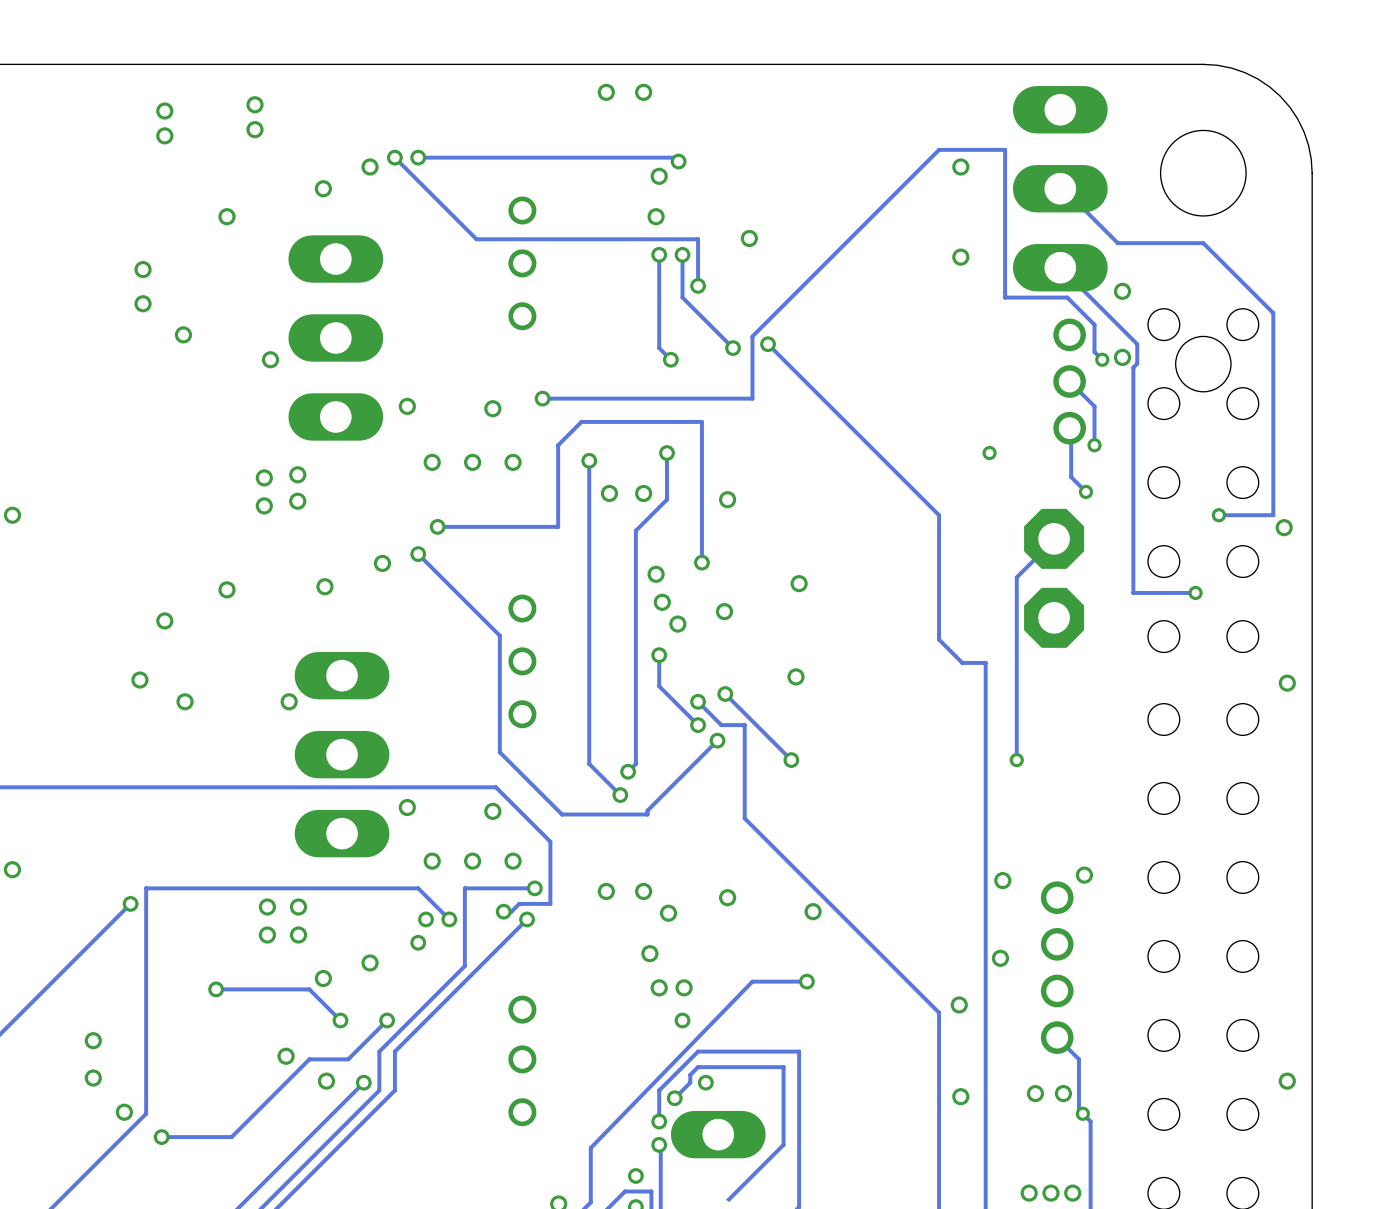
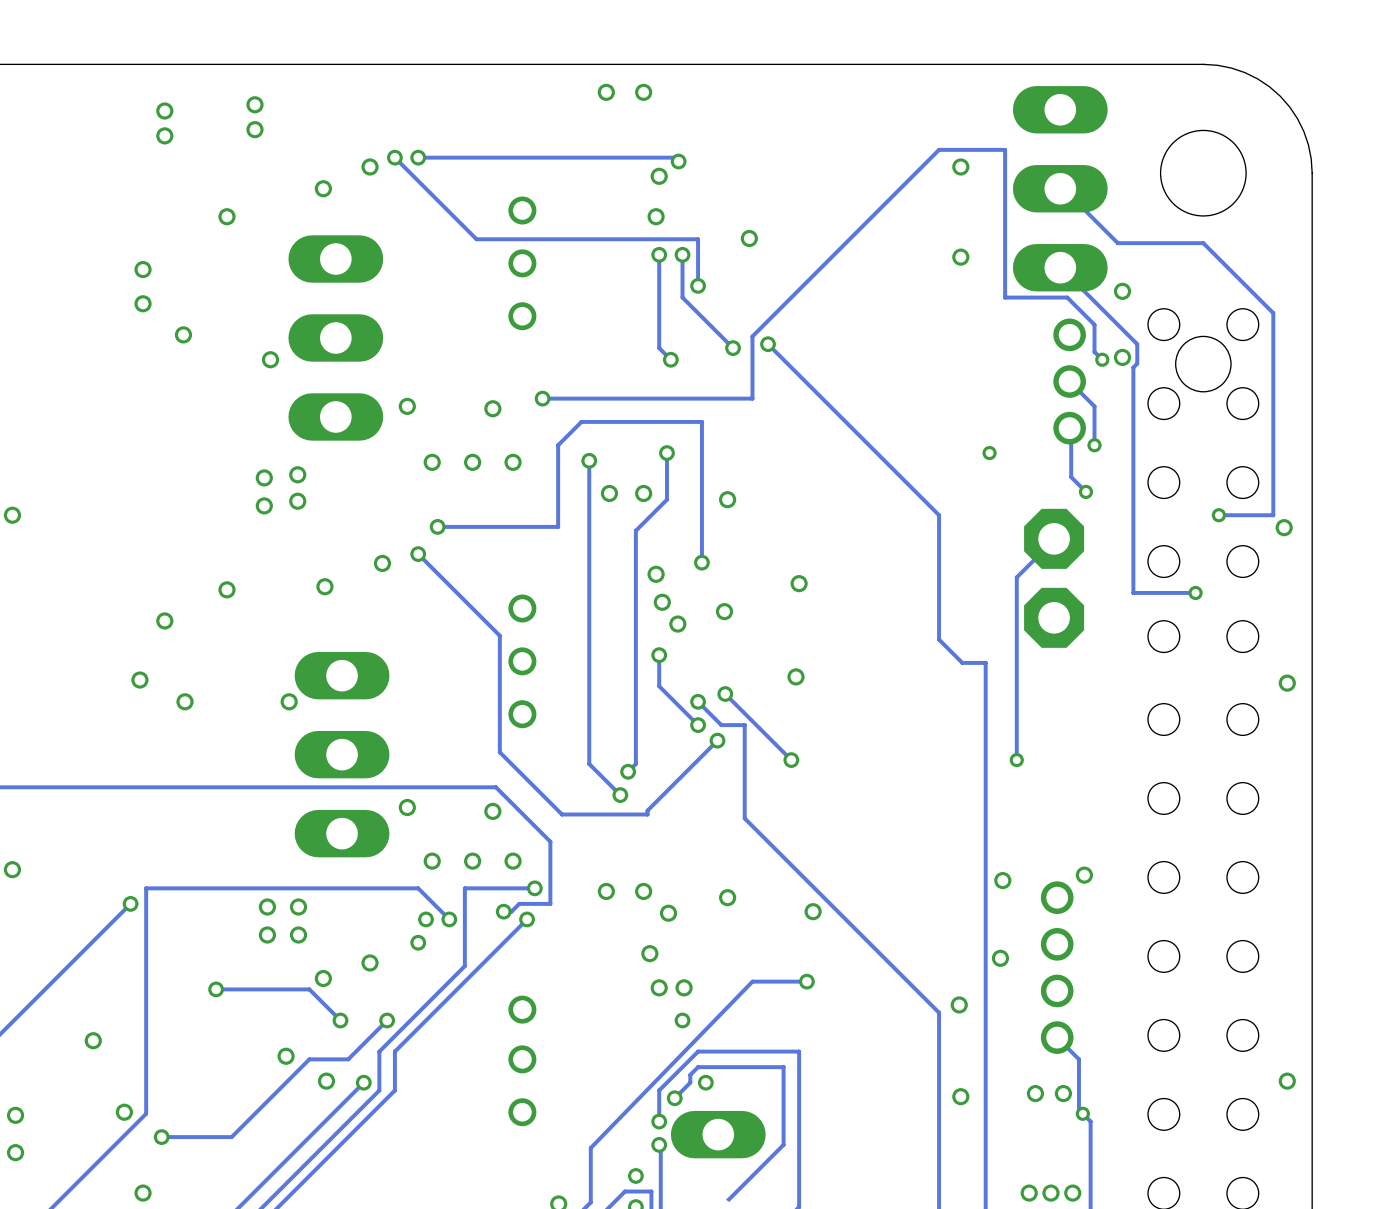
via: (93, 1078) -> none
via: none -> (15, 1115)
via: none -> (15, 1152)
via: none -> (143, 1193)

